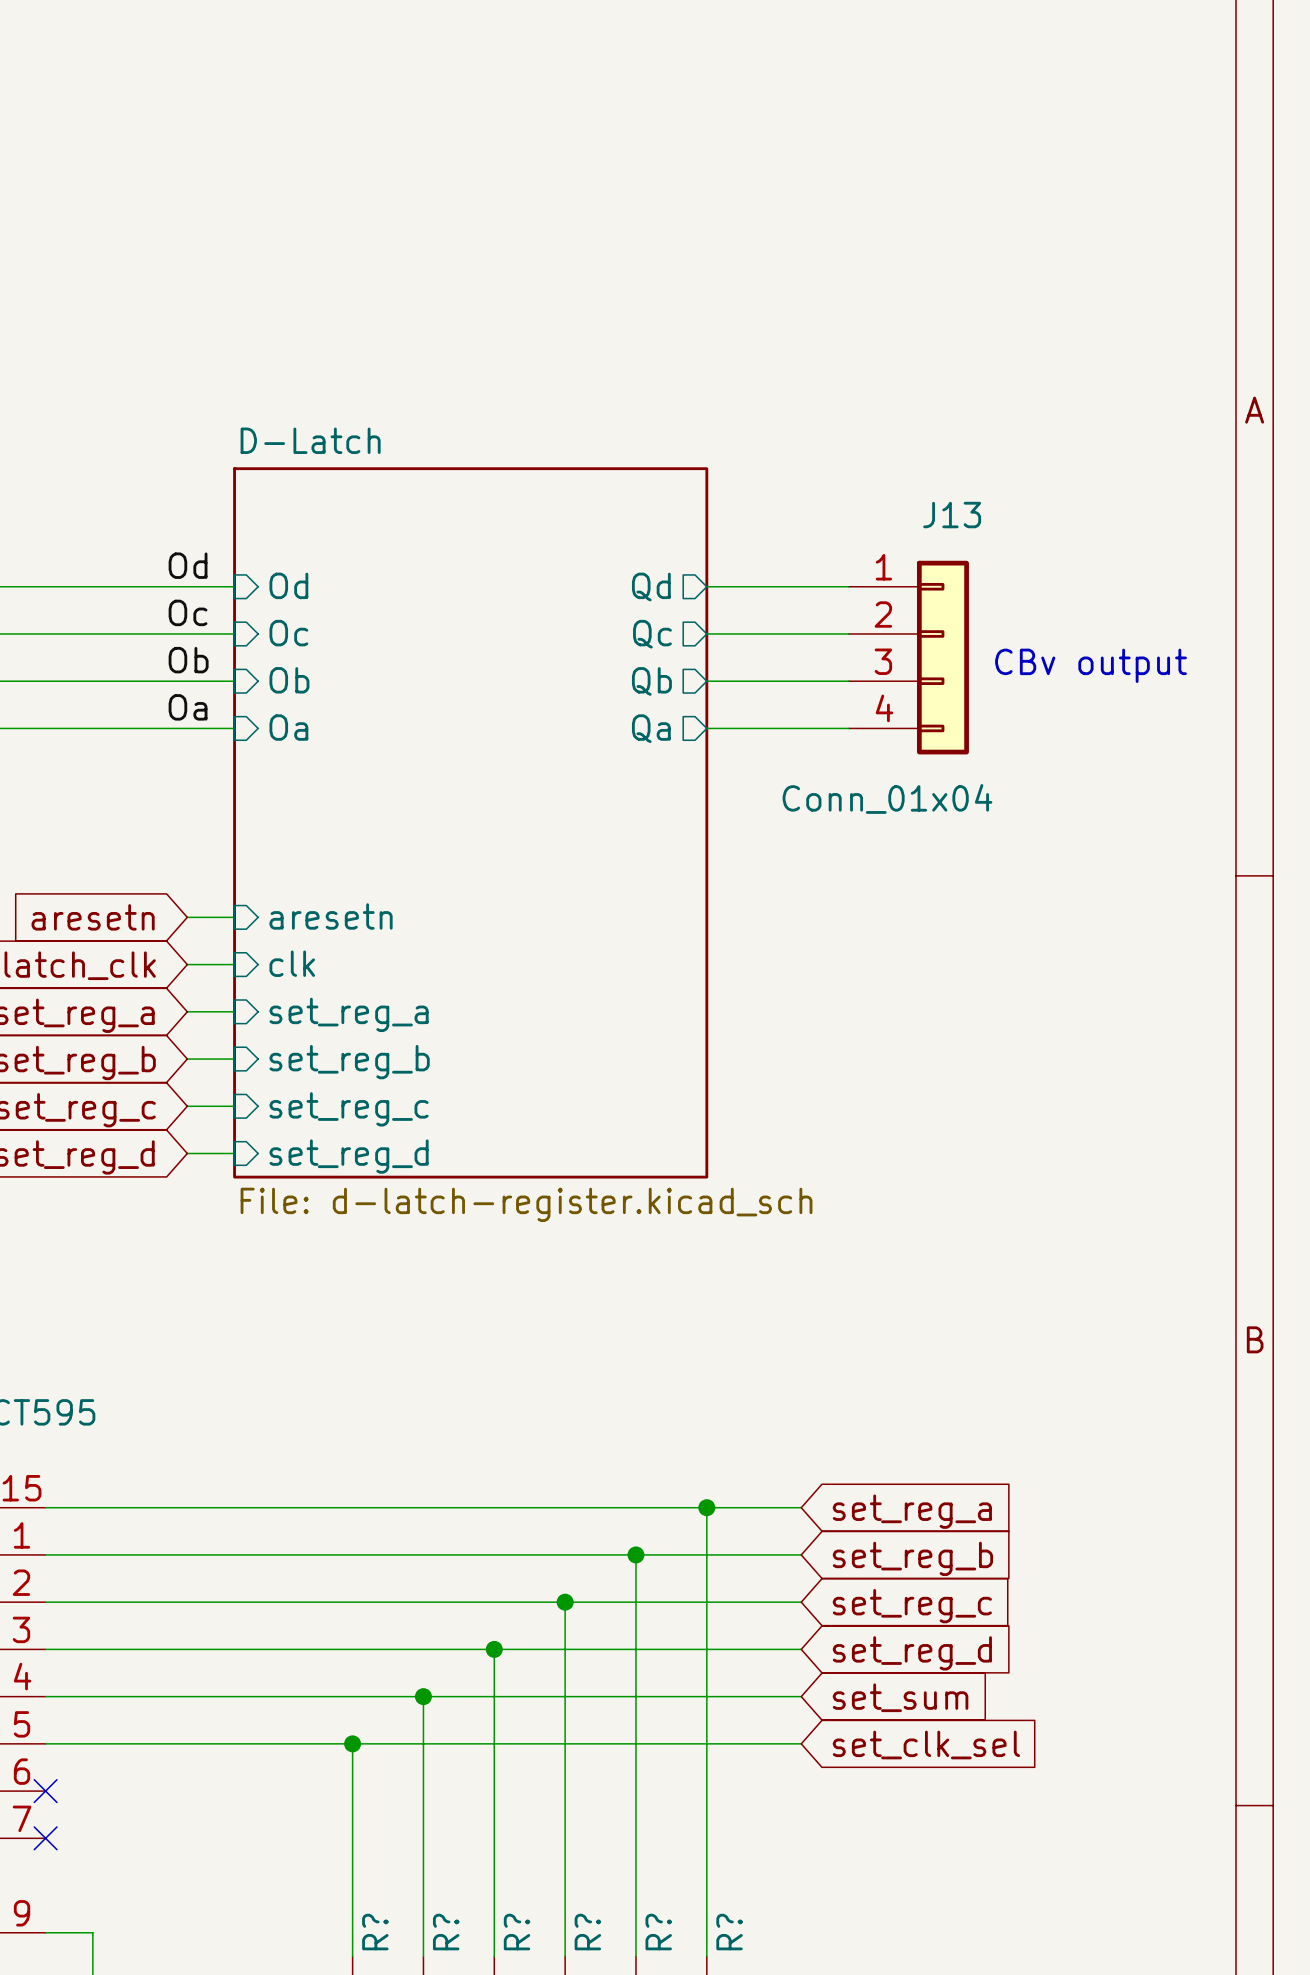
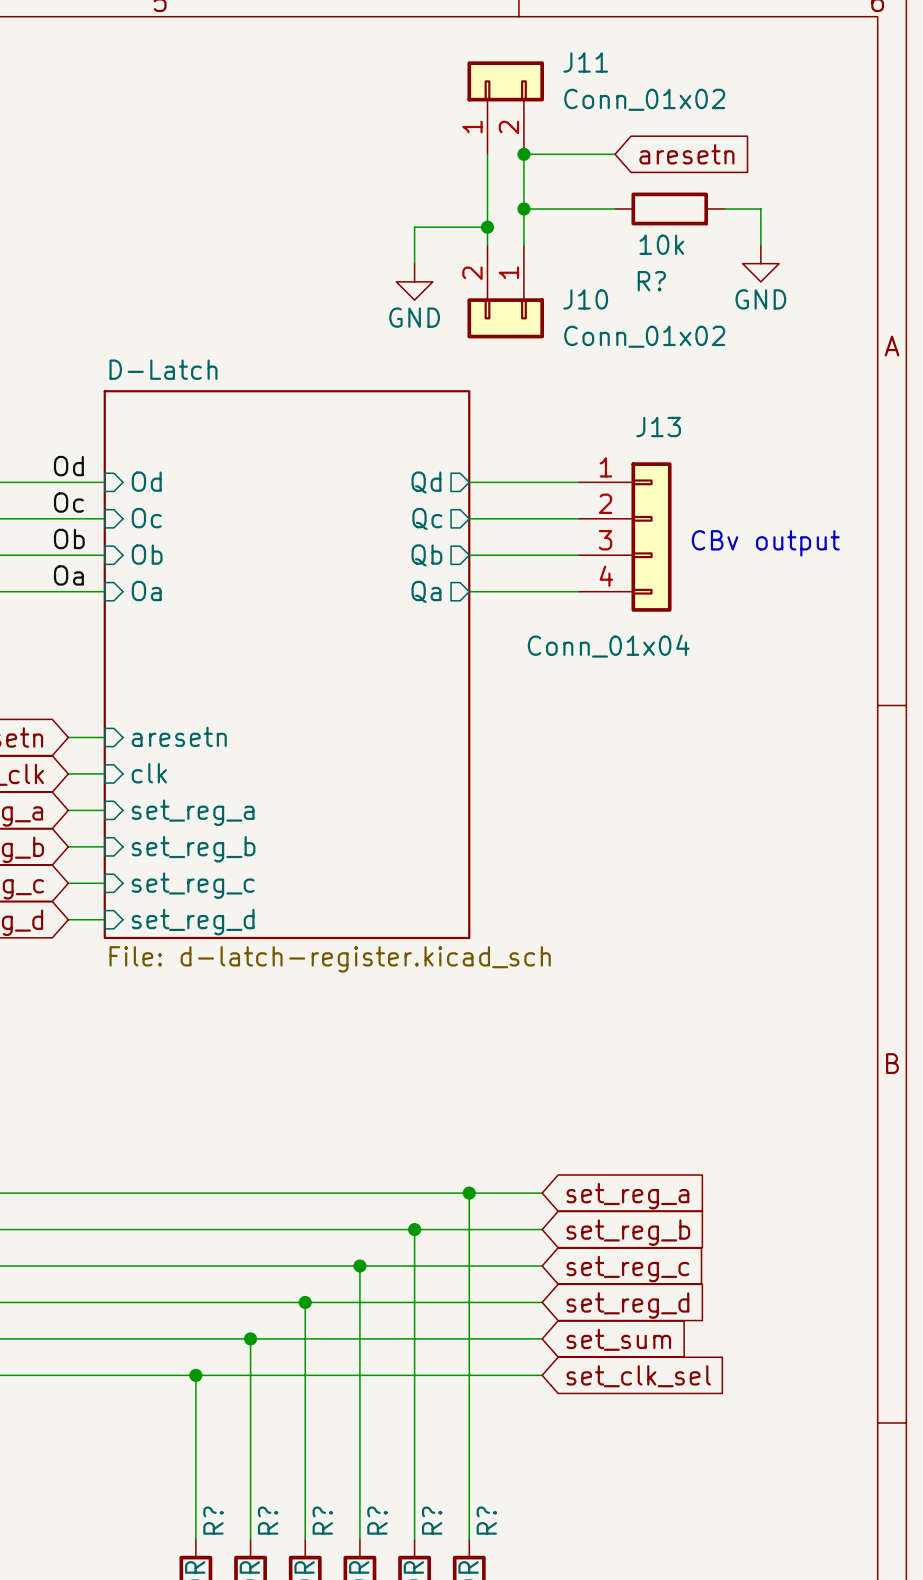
J11: none -> Conn_01x02 (505, 107)
wire: none -> (487, 154) (487, 245)
junction: none -> (523, 154)
wire: none -> (615, 154) (523, 154) (523, 245)
global label: none -> aresetn (686, 154)
wire: none -> (523, 208) (615, 208)
junction: none -> (523, 208)
R?: none -> 10k (669, 208)
wire: none -> (724, 208) (760, 208) (760, 245)
wire: none -> (487, 227) (414, 227) (414, 263)
junction: none -> (487, 227)
power symbol: none -> GND (760, 263)
power symbol: none -> GND (414, 281)
J10: none -> Conn_01x02 (505, 291)

